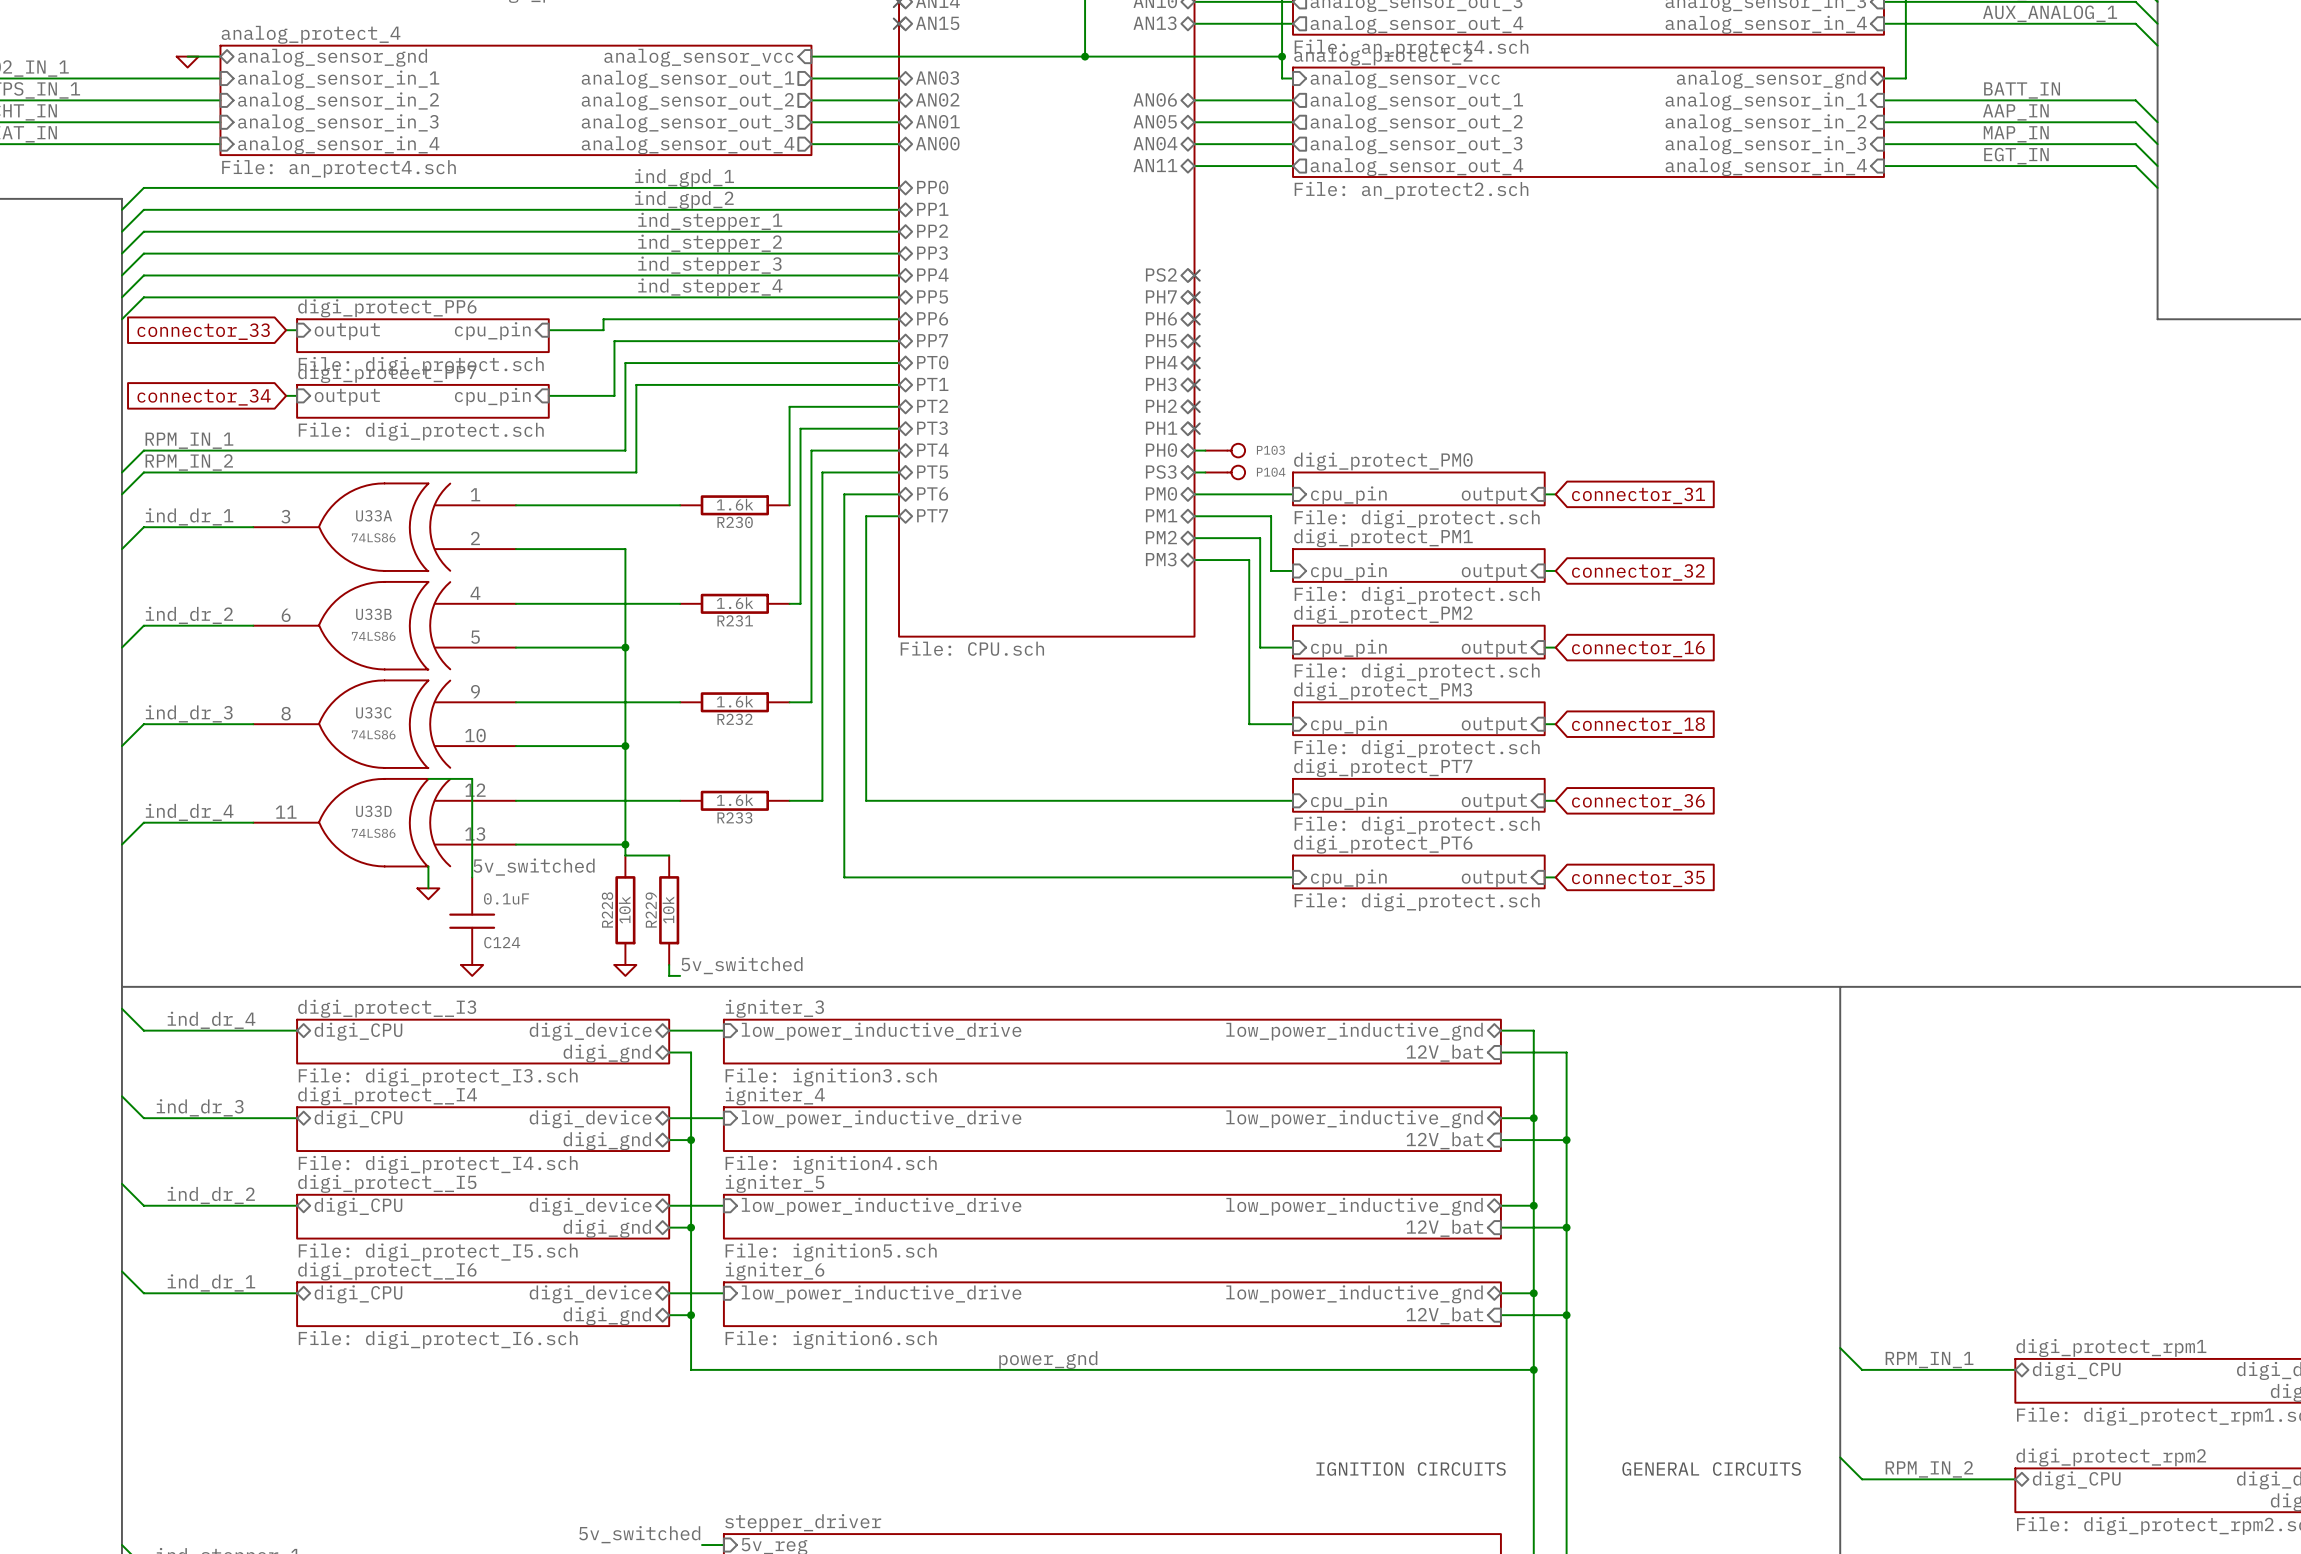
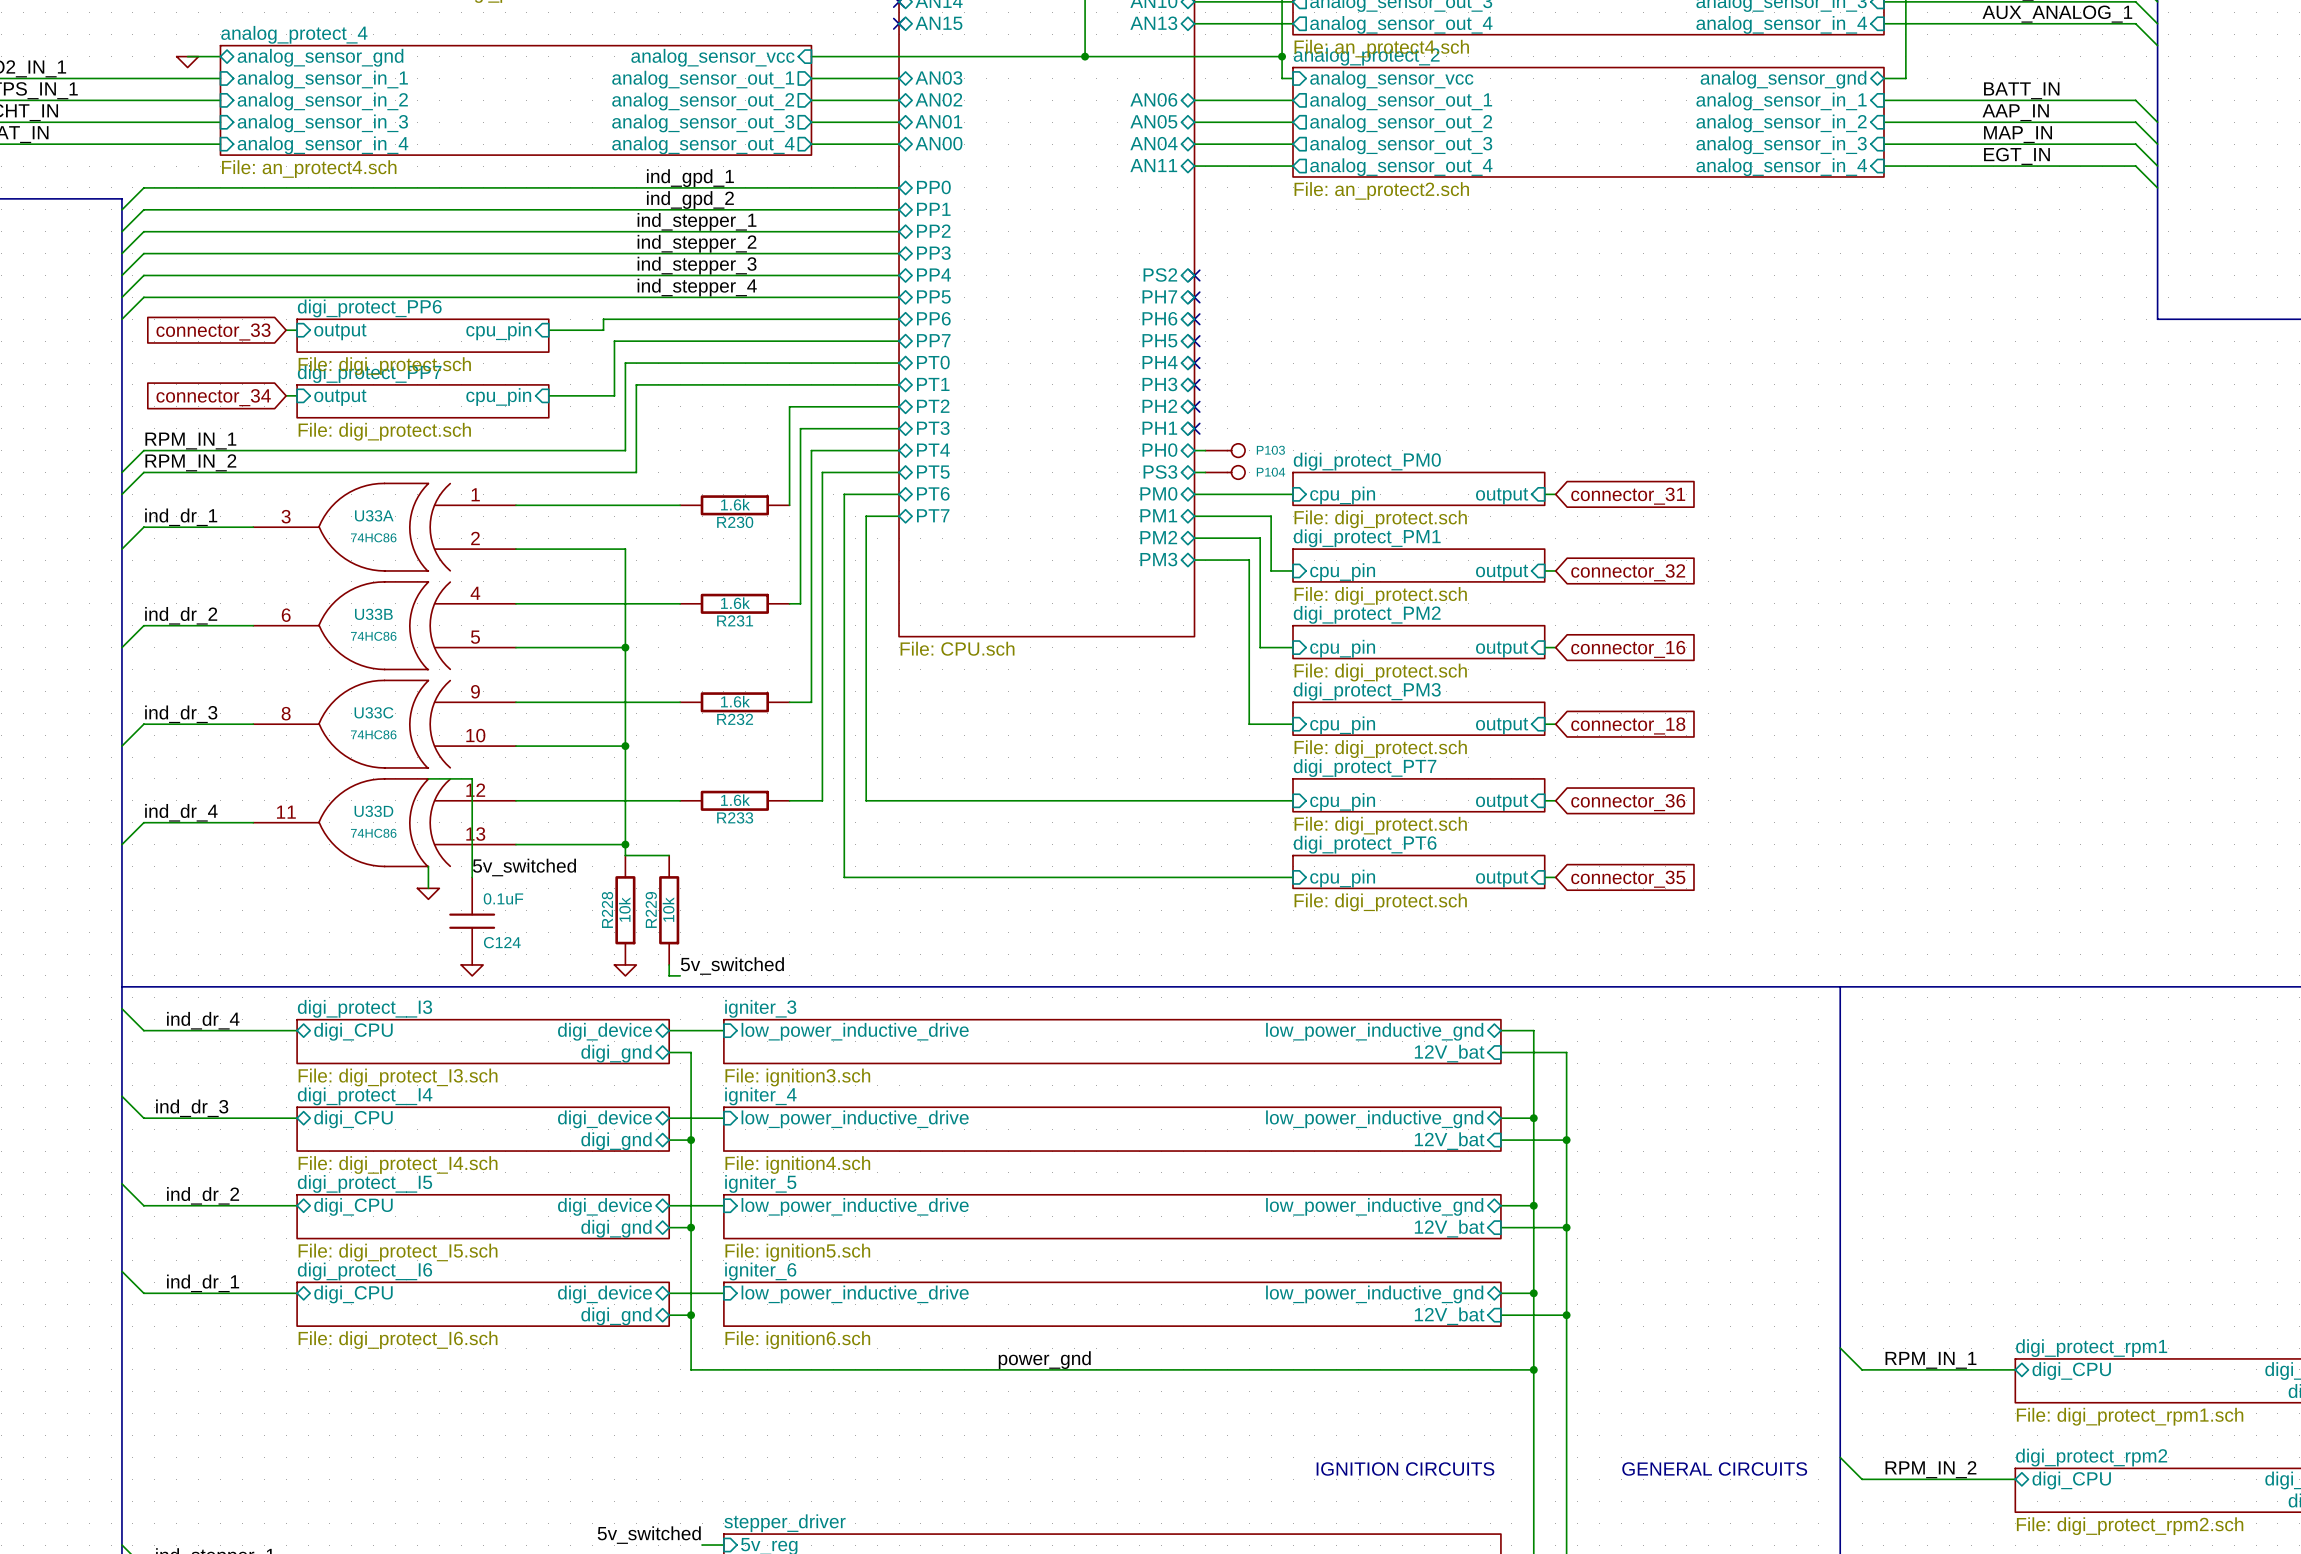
U33A value: 74LS86 (373, 537) -> 74HC86 (373, 537)
U33B value: 74LS86 (373, 636) -> 74HC86 (373, 636)
U33C value: 74LS86 (373, 734) -> 74HC86 (373, 734)
U33D value: 74LS86 (373, 833) -> 74HC86 (373, 833)

